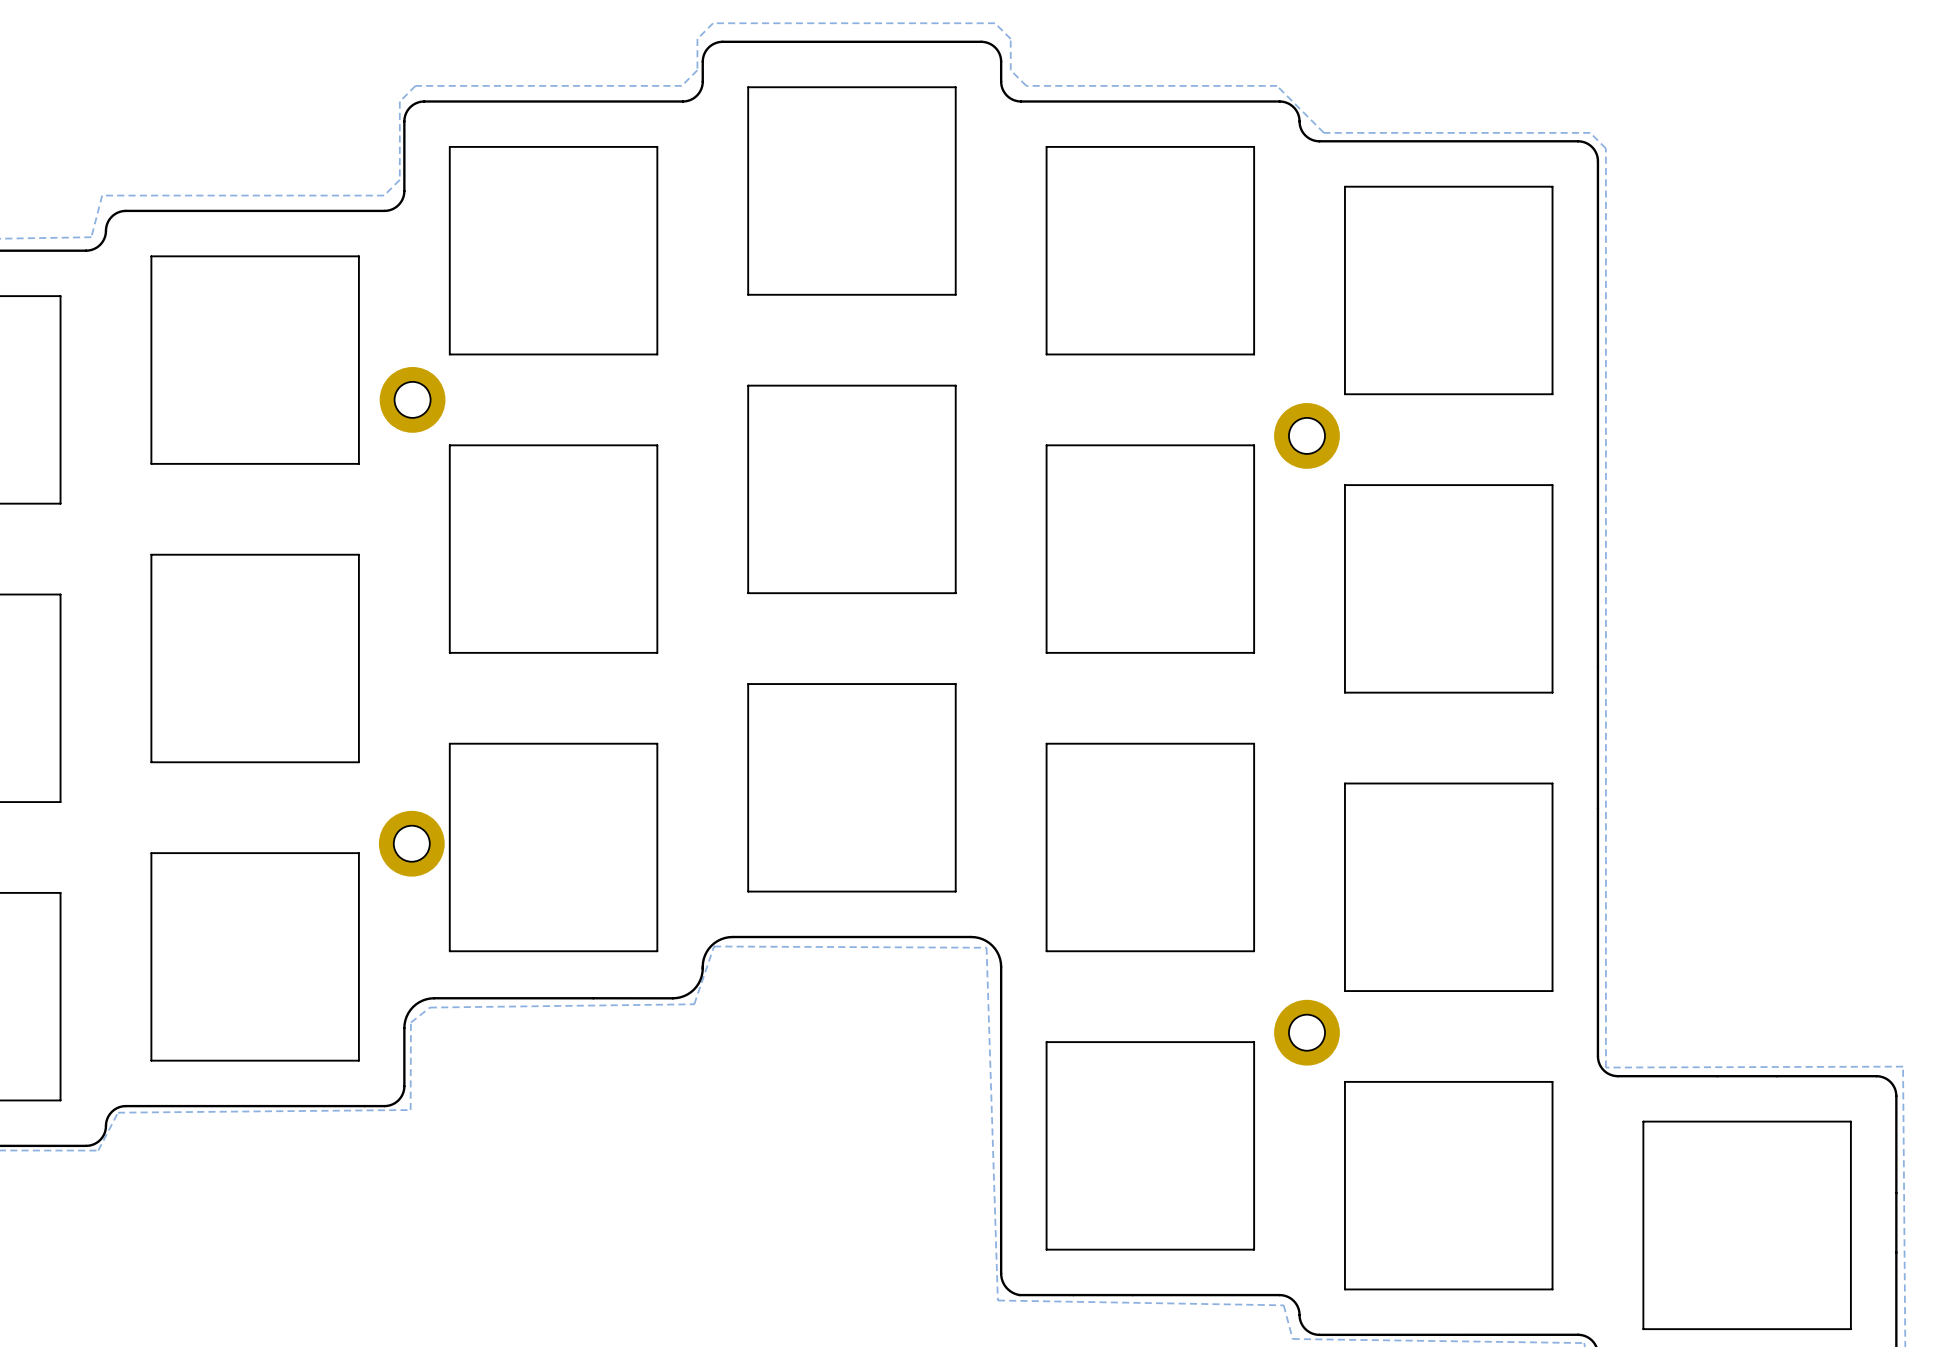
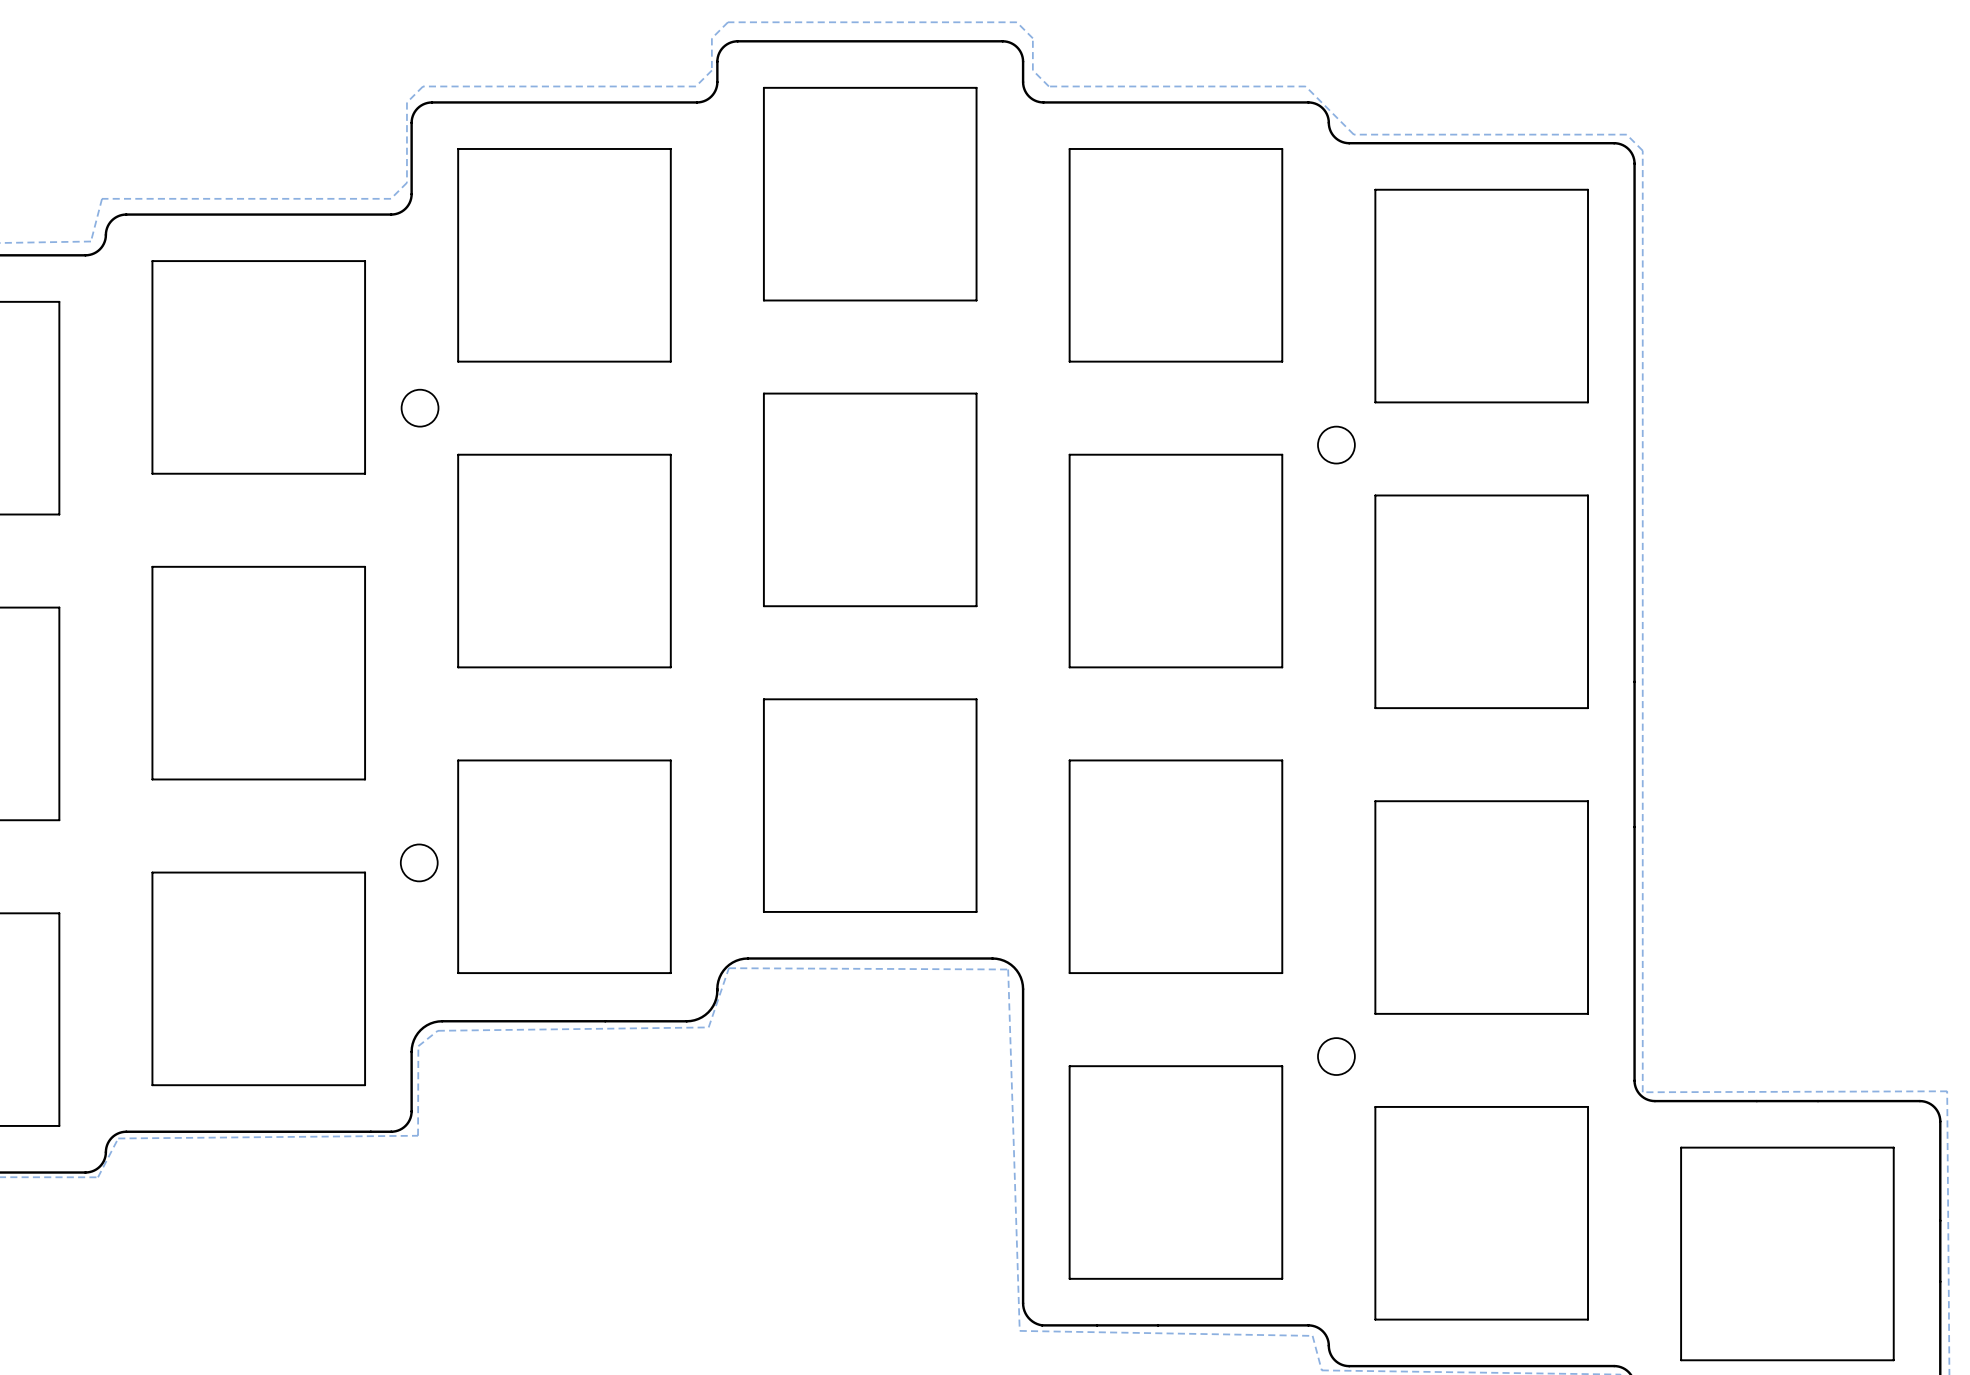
drawing: none -> [400, 388, 440, 428]
part: (412, 399) -> none
drawing: none -> [1317, 425, 1356, 465]
part: (1306, 435) -> none
drawing: none -> [399, 843, 439, 883]
part: (411, 843) -> none
drawing: none -> [1317, 1037, 1356, 1076]
part: (1306, 1032) -> none

